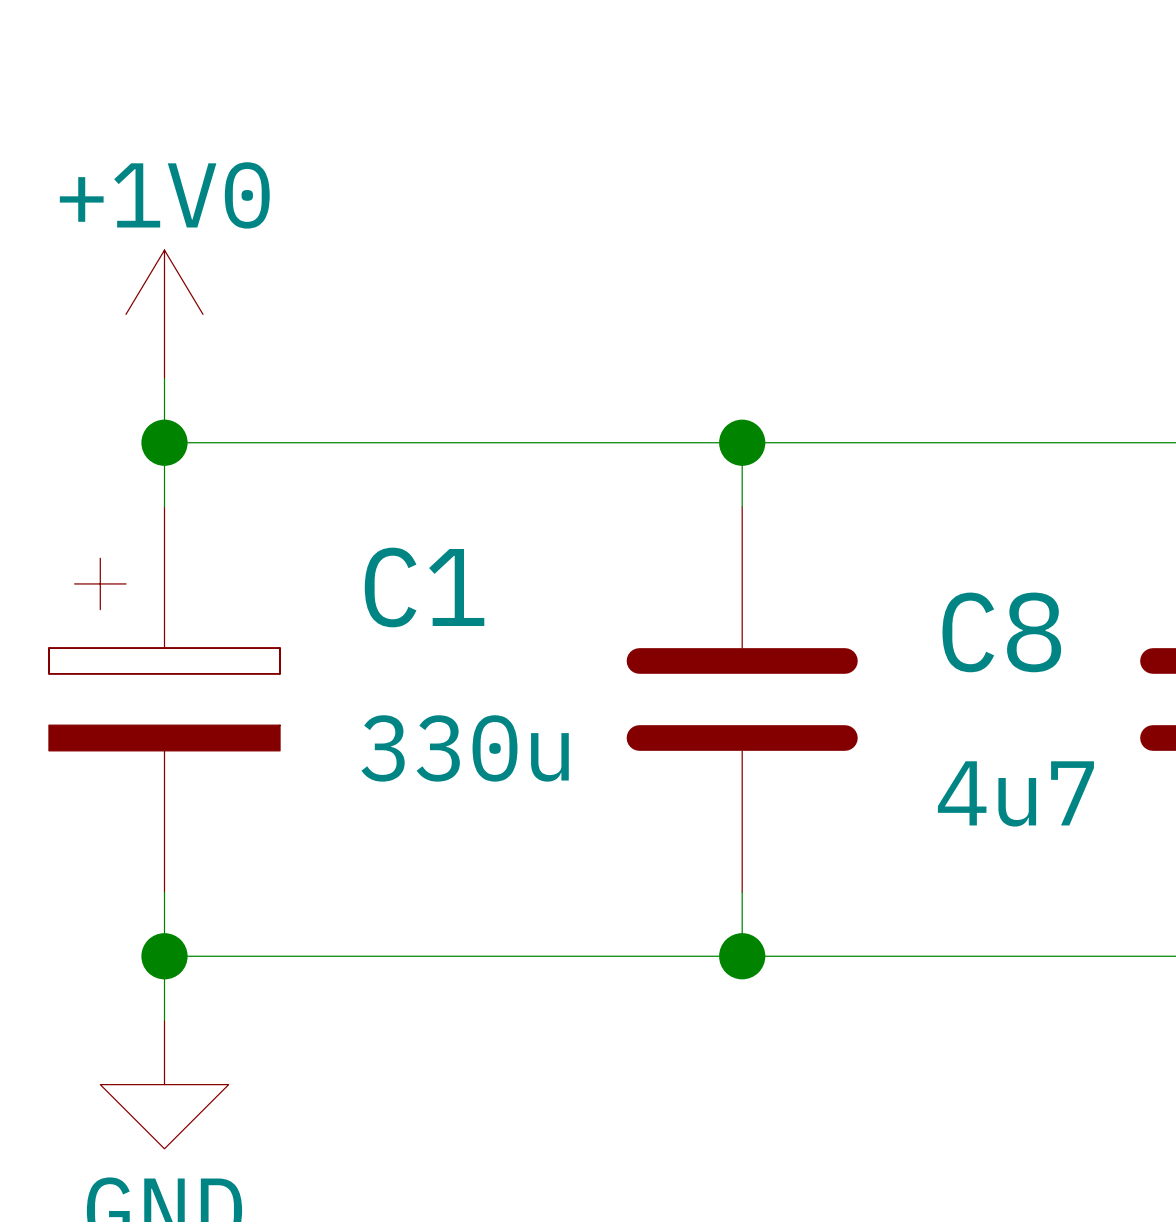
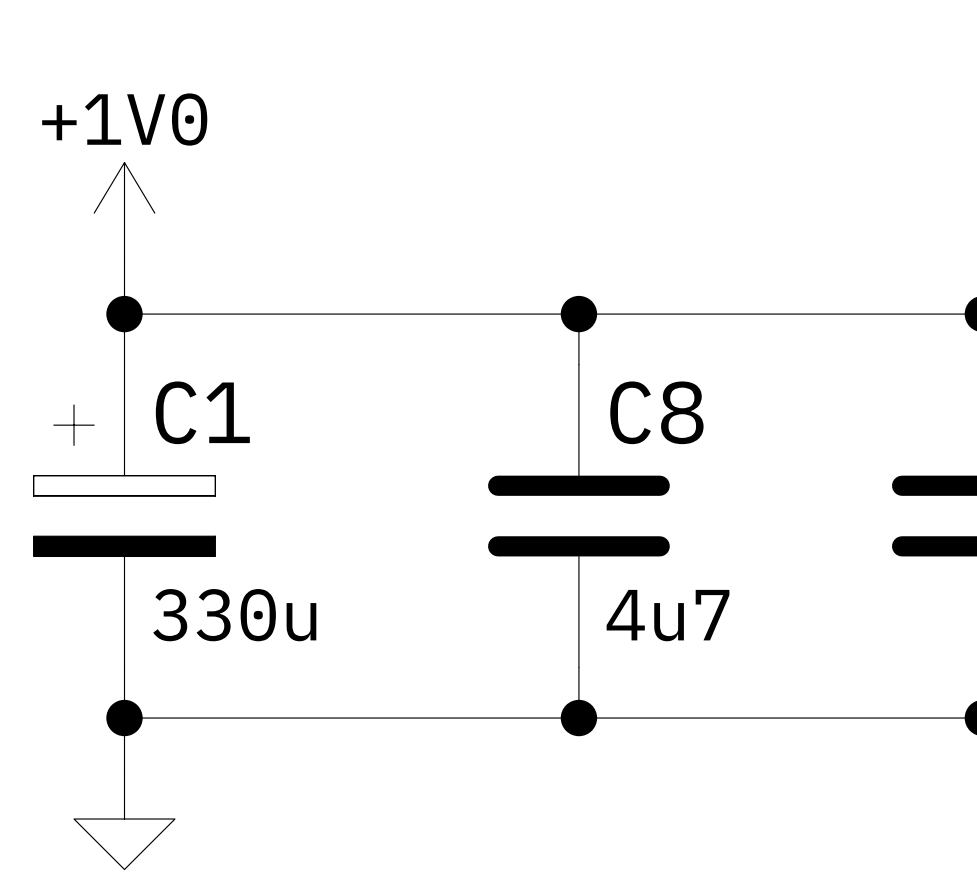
C1 name position: C1 (424, 587) -> C1 (202, 412)
C8 name position: C8 (1001, 632) -> C8 (656, 412)
C1 text position: 330u (465, 748) -> 330u (234, 615)
C8 text position: 4u7 (1015, 793) -> 4u7 (668, 615)

